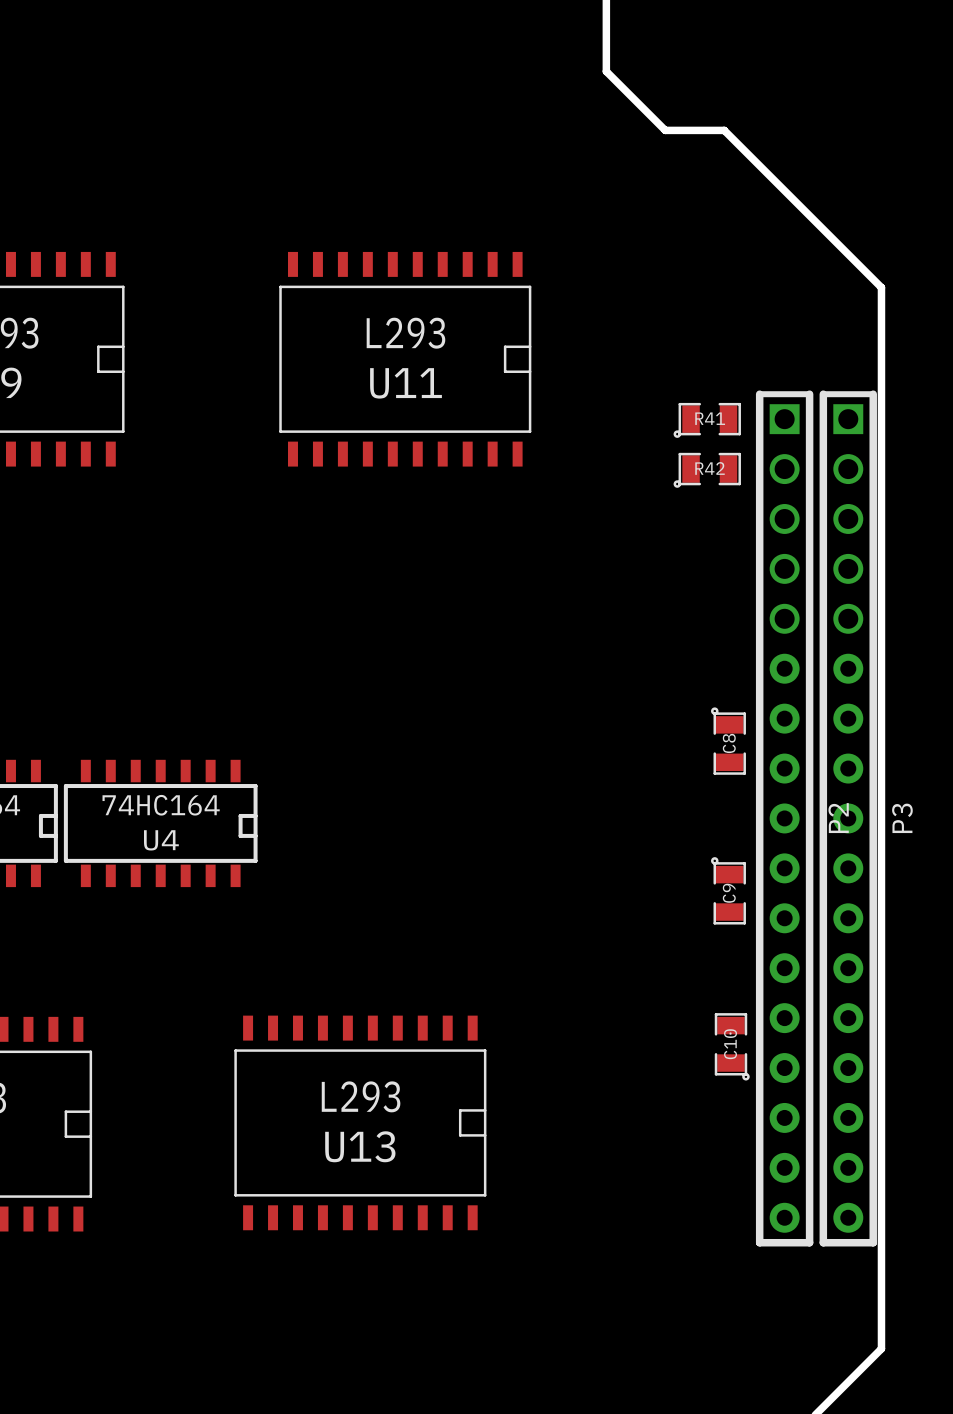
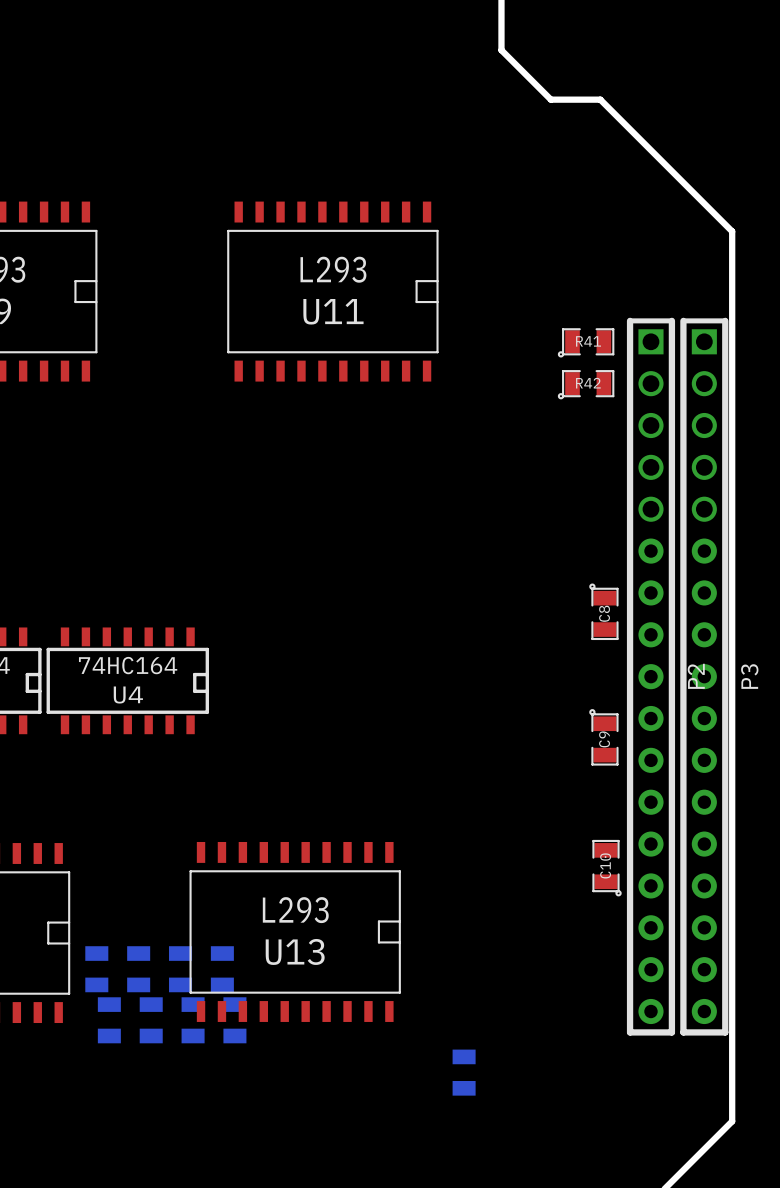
part: none -> (96, 969)
part: none -> (138, 969)
part: none -> (180, 969)
part: none -> (222, 969)
part: none -> (109, 1020)
part: none -> (151, 1020)
part: none -> (193, 1020)
part: none -> (234, 1020)
part: none -> (464, 1072)

